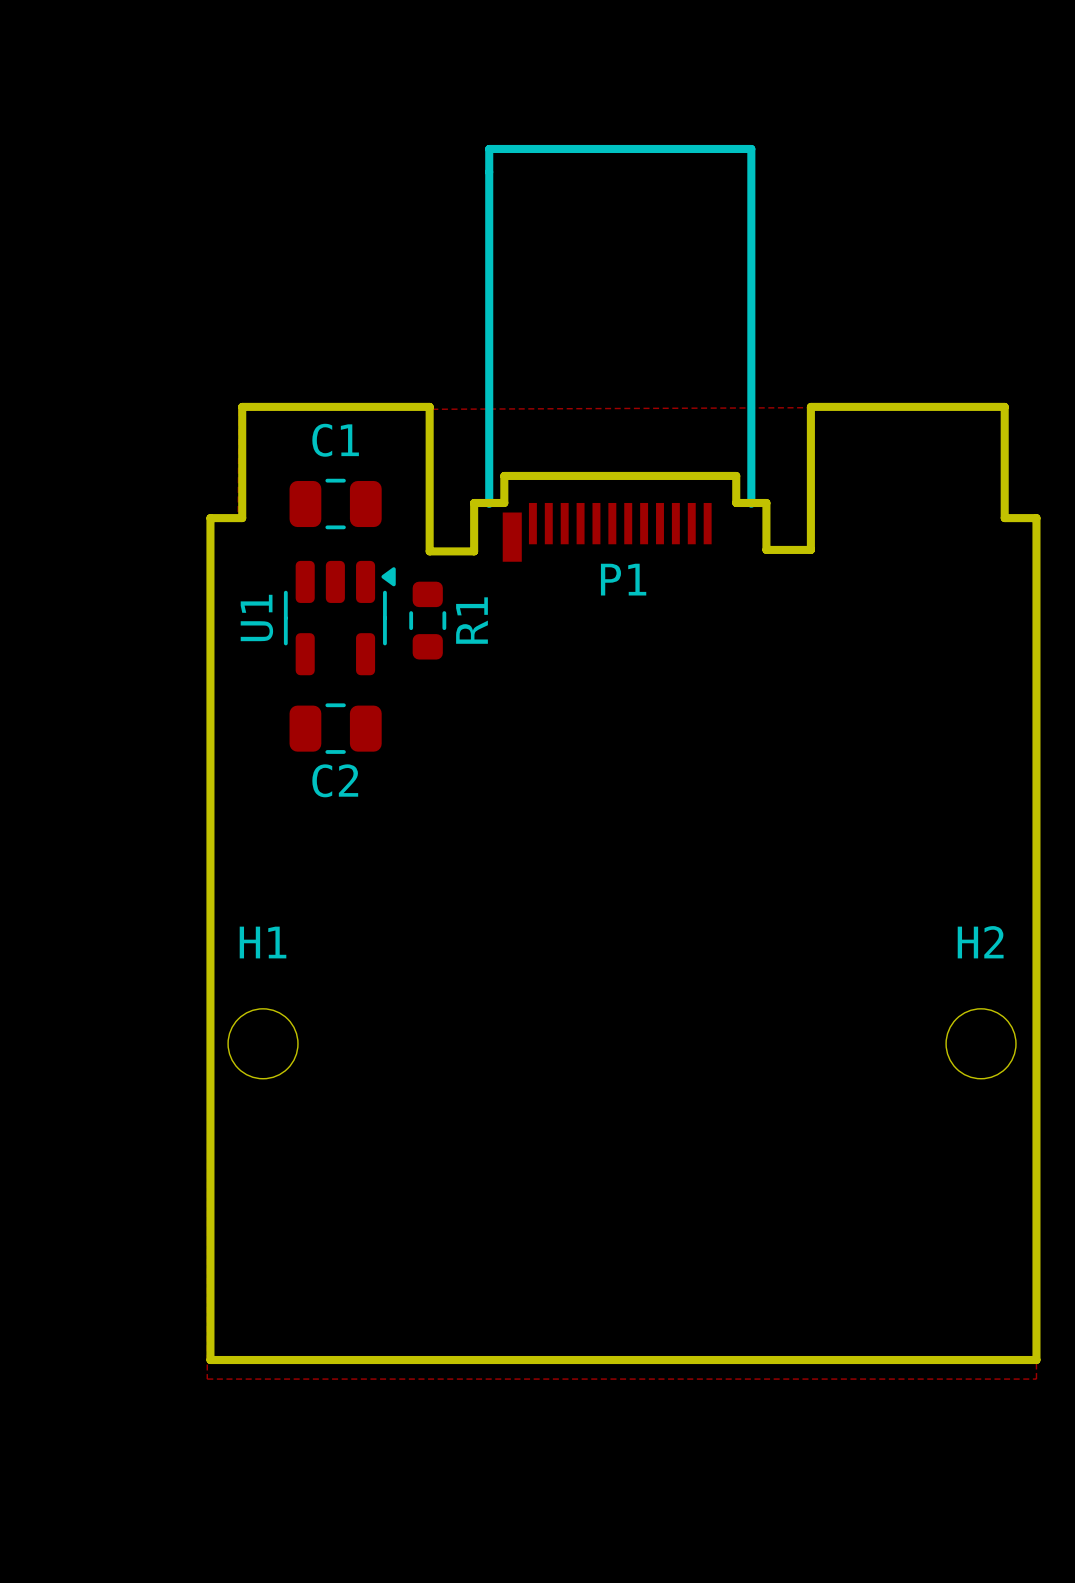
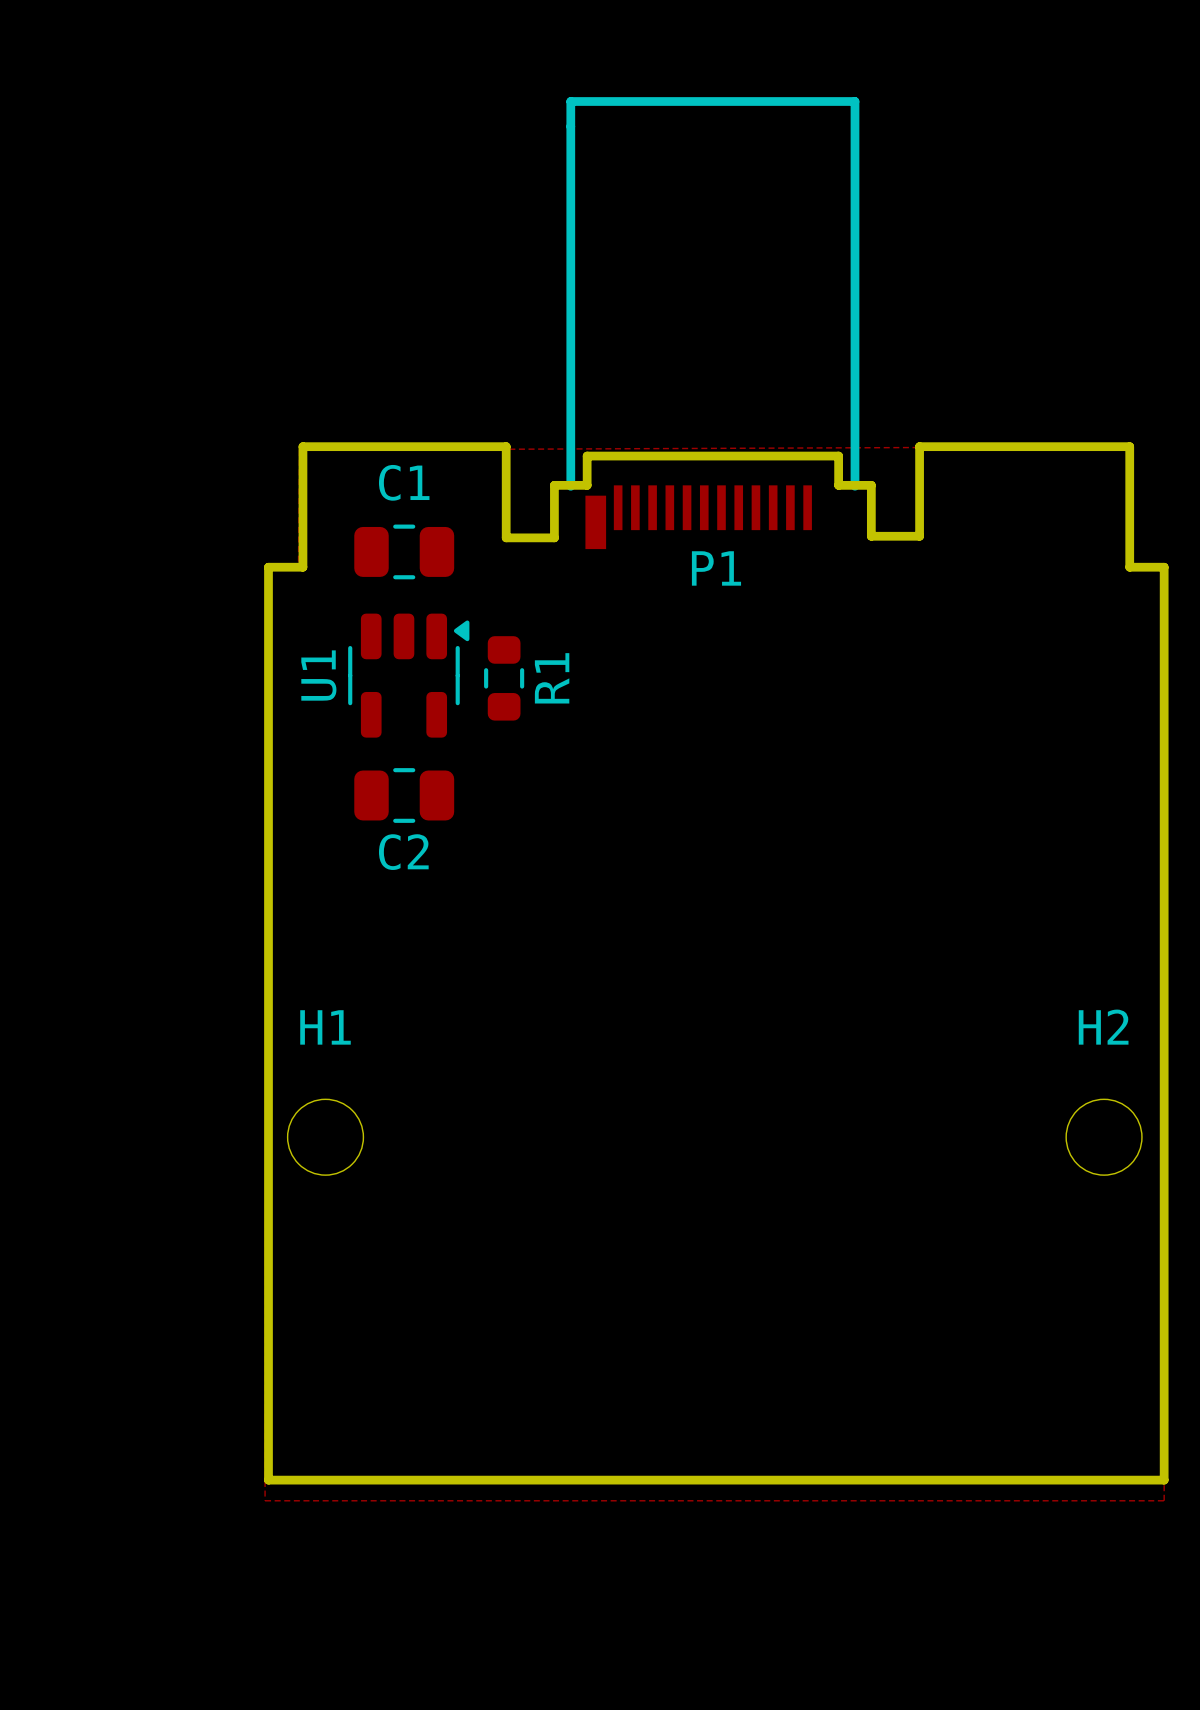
P1 position: (620, 353) -> (712, 323)
board edge: (810, 489) (810, 549) (766, 549) -> (919, 536) (871, 536)
board edge: (429, 491) (429, 551) (474, 551) -> (506, 537) (554, 537)

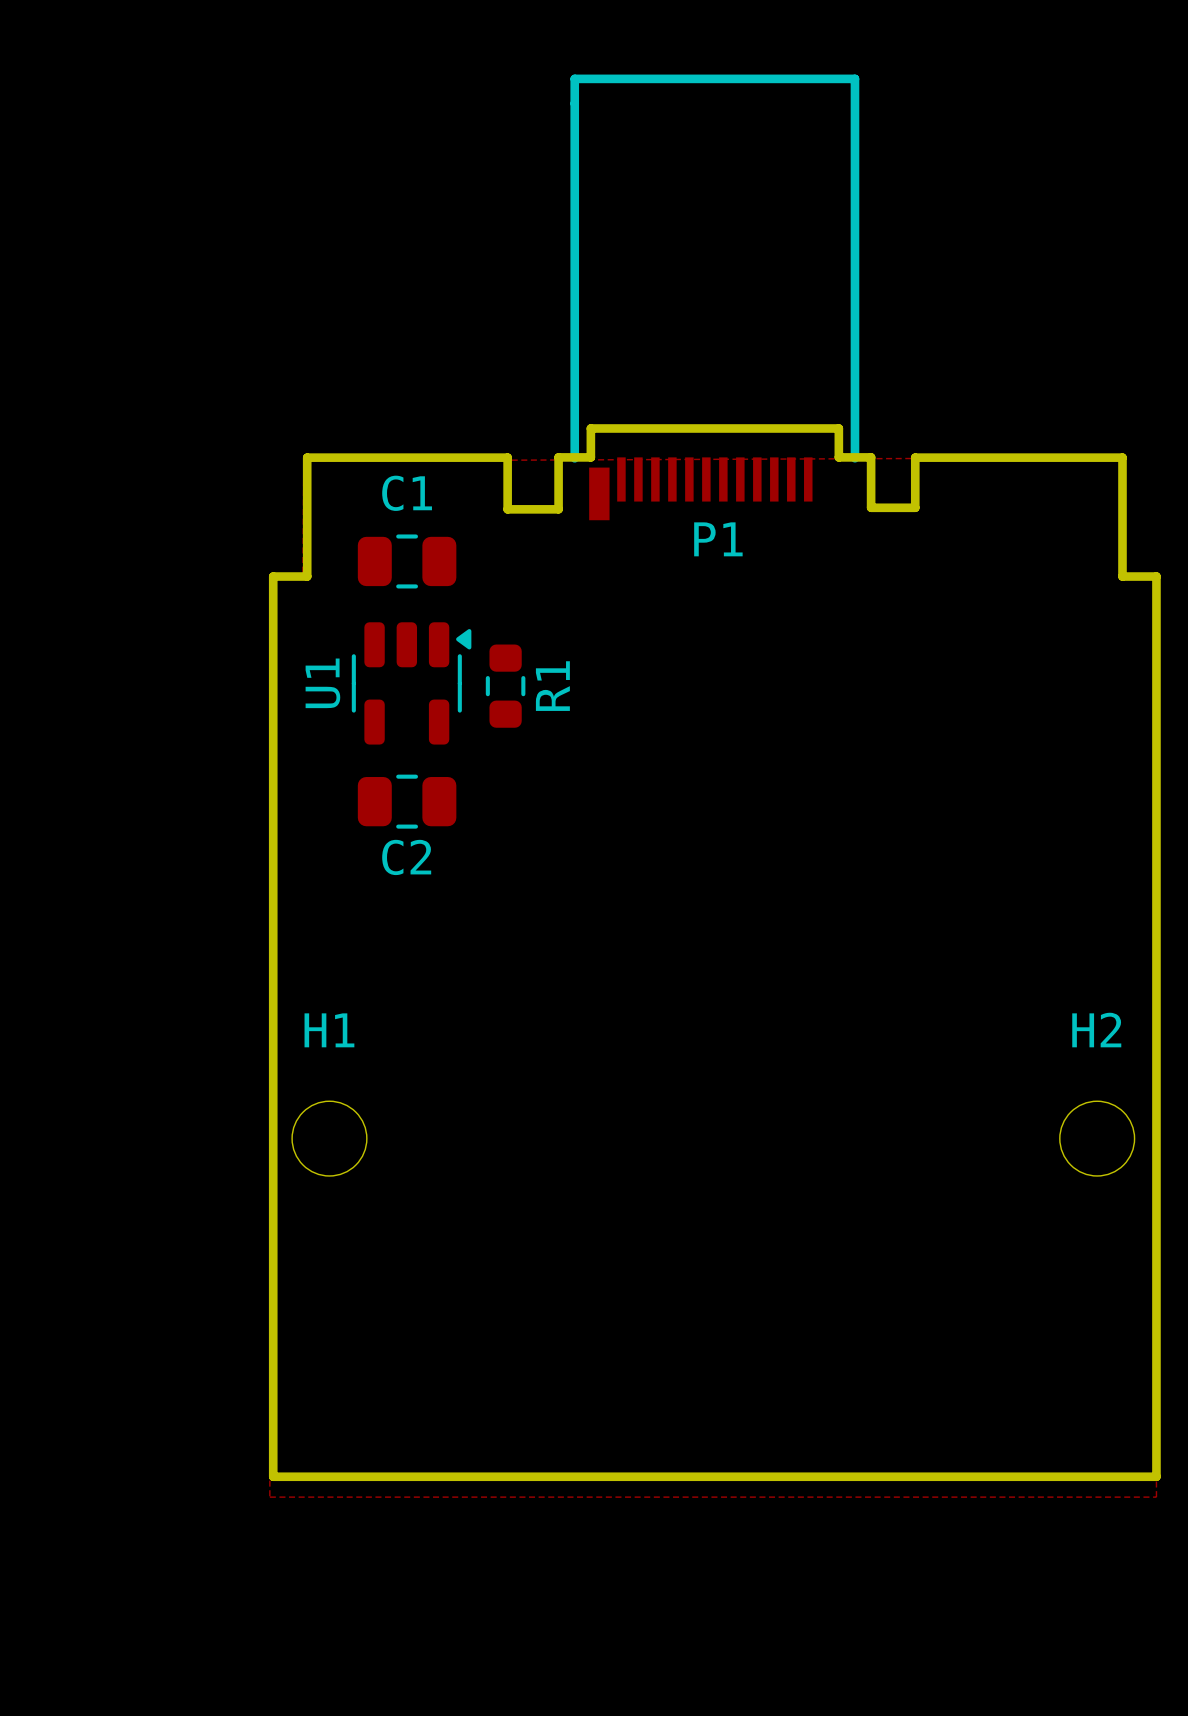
P1 position: (712, 323) -> (714, 297)
board edge: (919, 497) (919, 536) (871, 536) -> (915, 507) (871, 507)
board edge: (506, 499) (506, 537) (554, 537) -> (507, 509) (558, 509)

